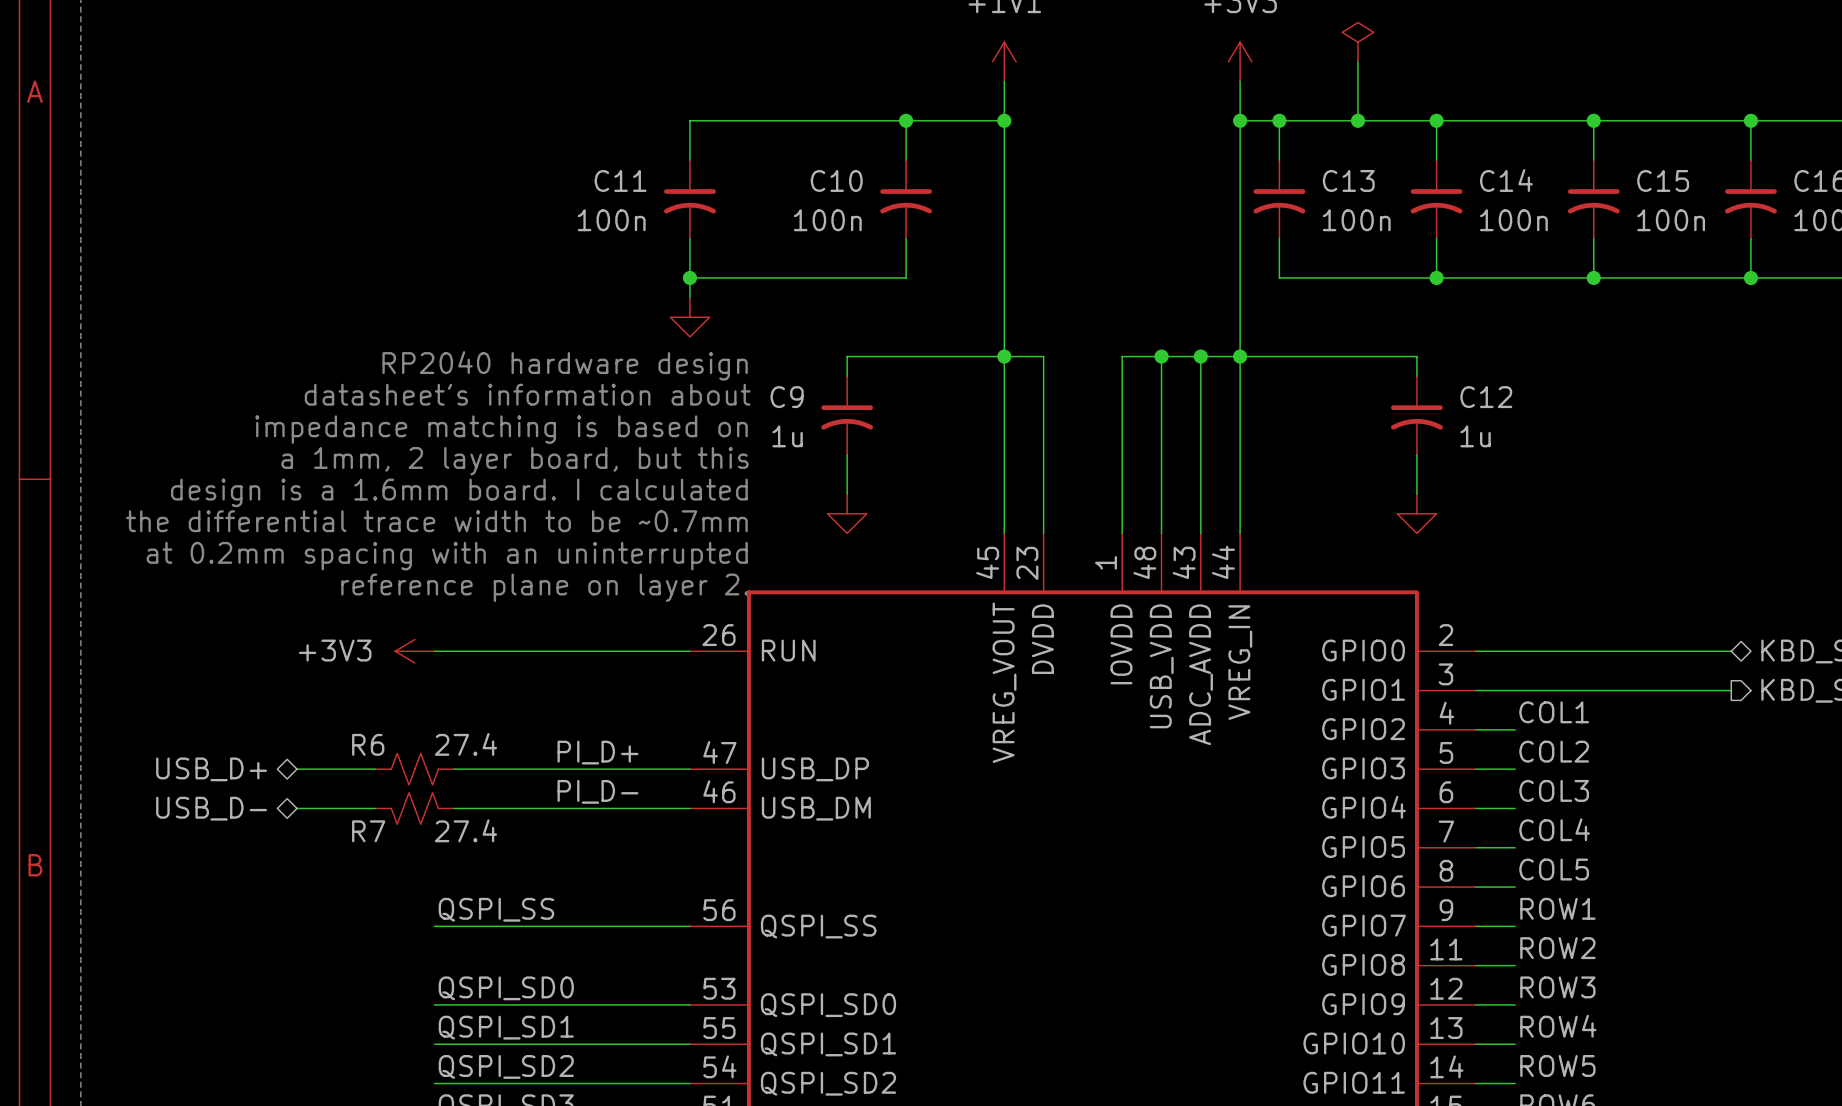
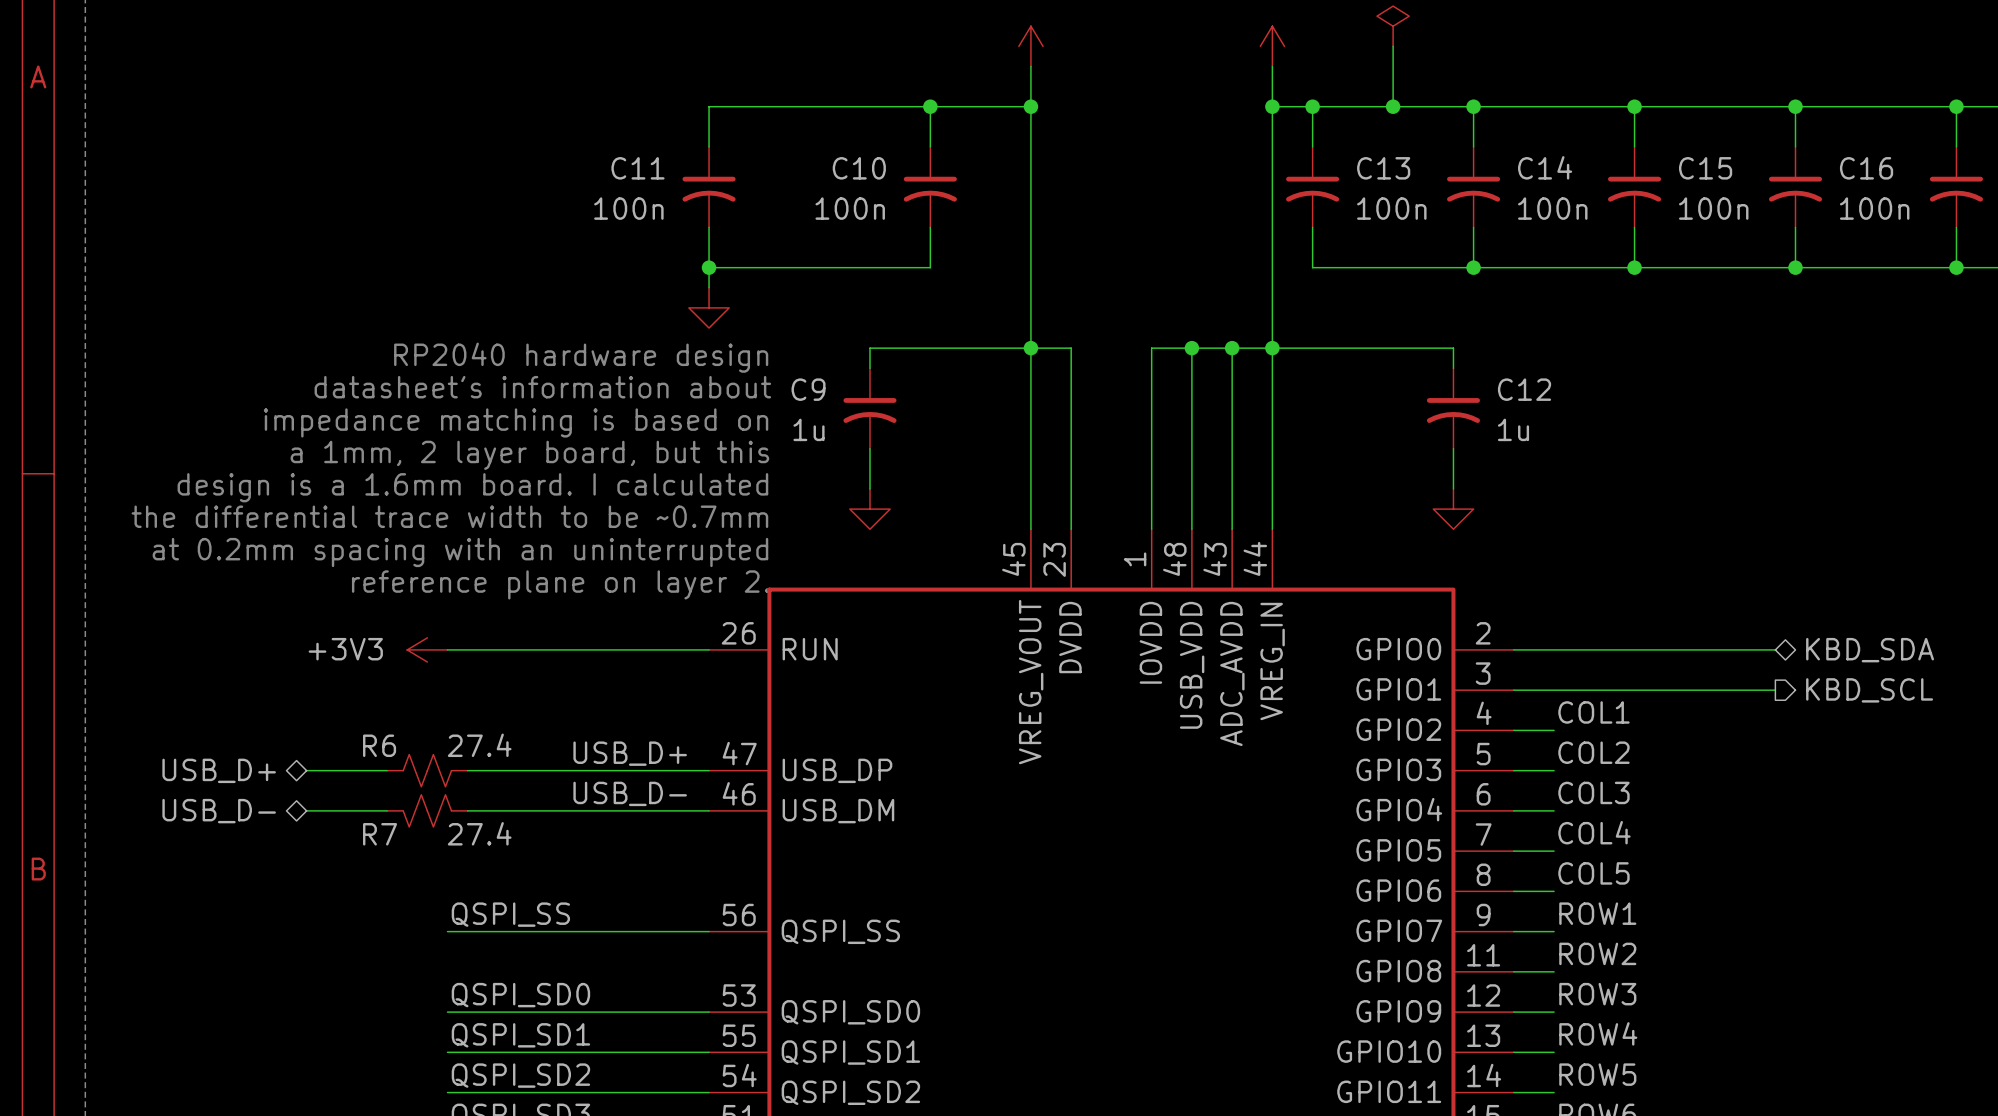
label: PI_D+ (597, 752) -> USB_D+ (630, 753)
label: PI_D- (597, 791) -> USB_D- (630, 793)

